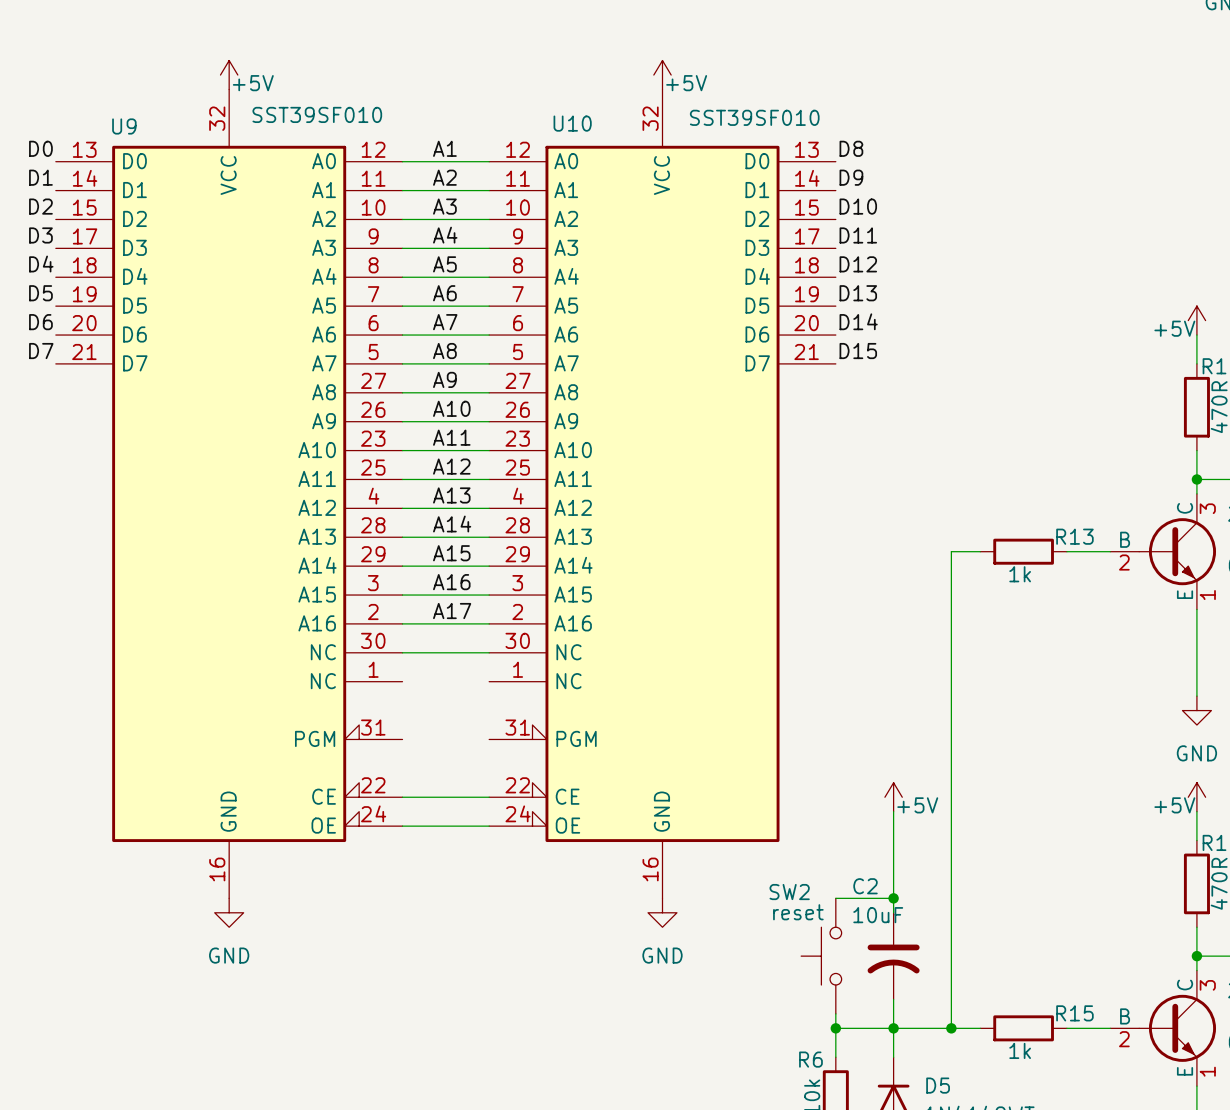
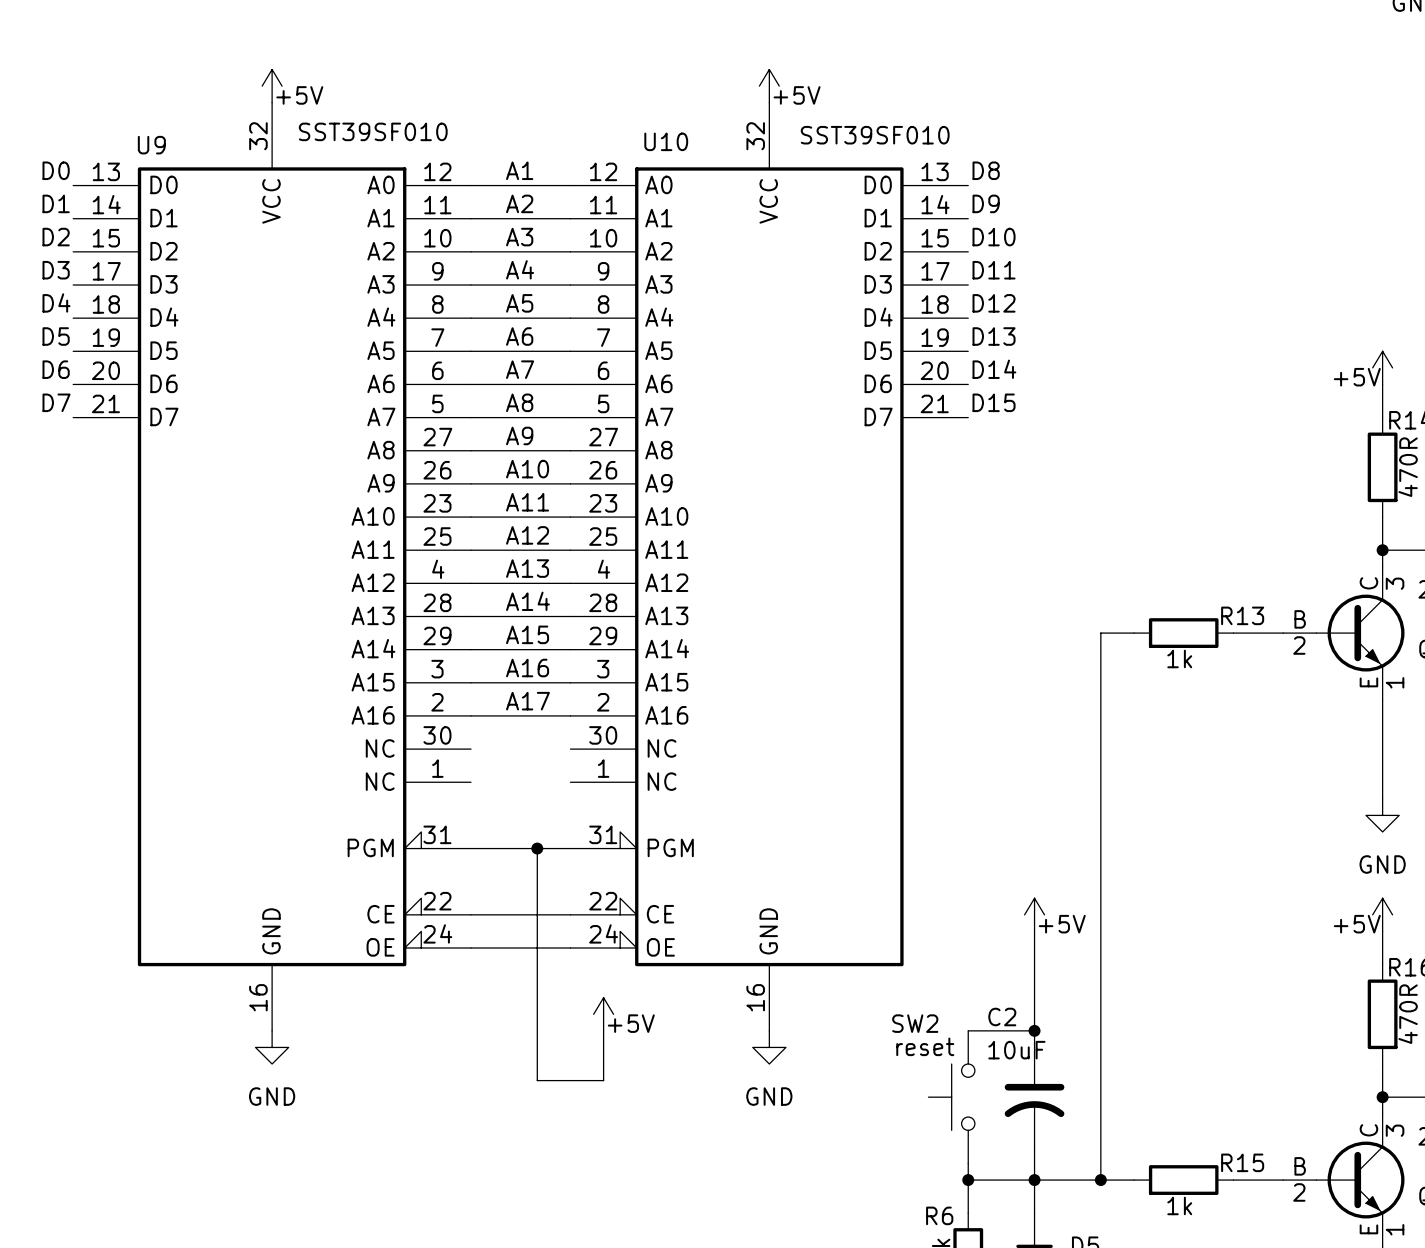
wire: (402, 652) (489, 652) -> (471, 848) (570, 848)
wire: none -> (537, 848) (537, 1080) (603, 1080) (603, 1030)
junction: none -> (537, 848)
power symbol: none -> +5V (603, 1014)

